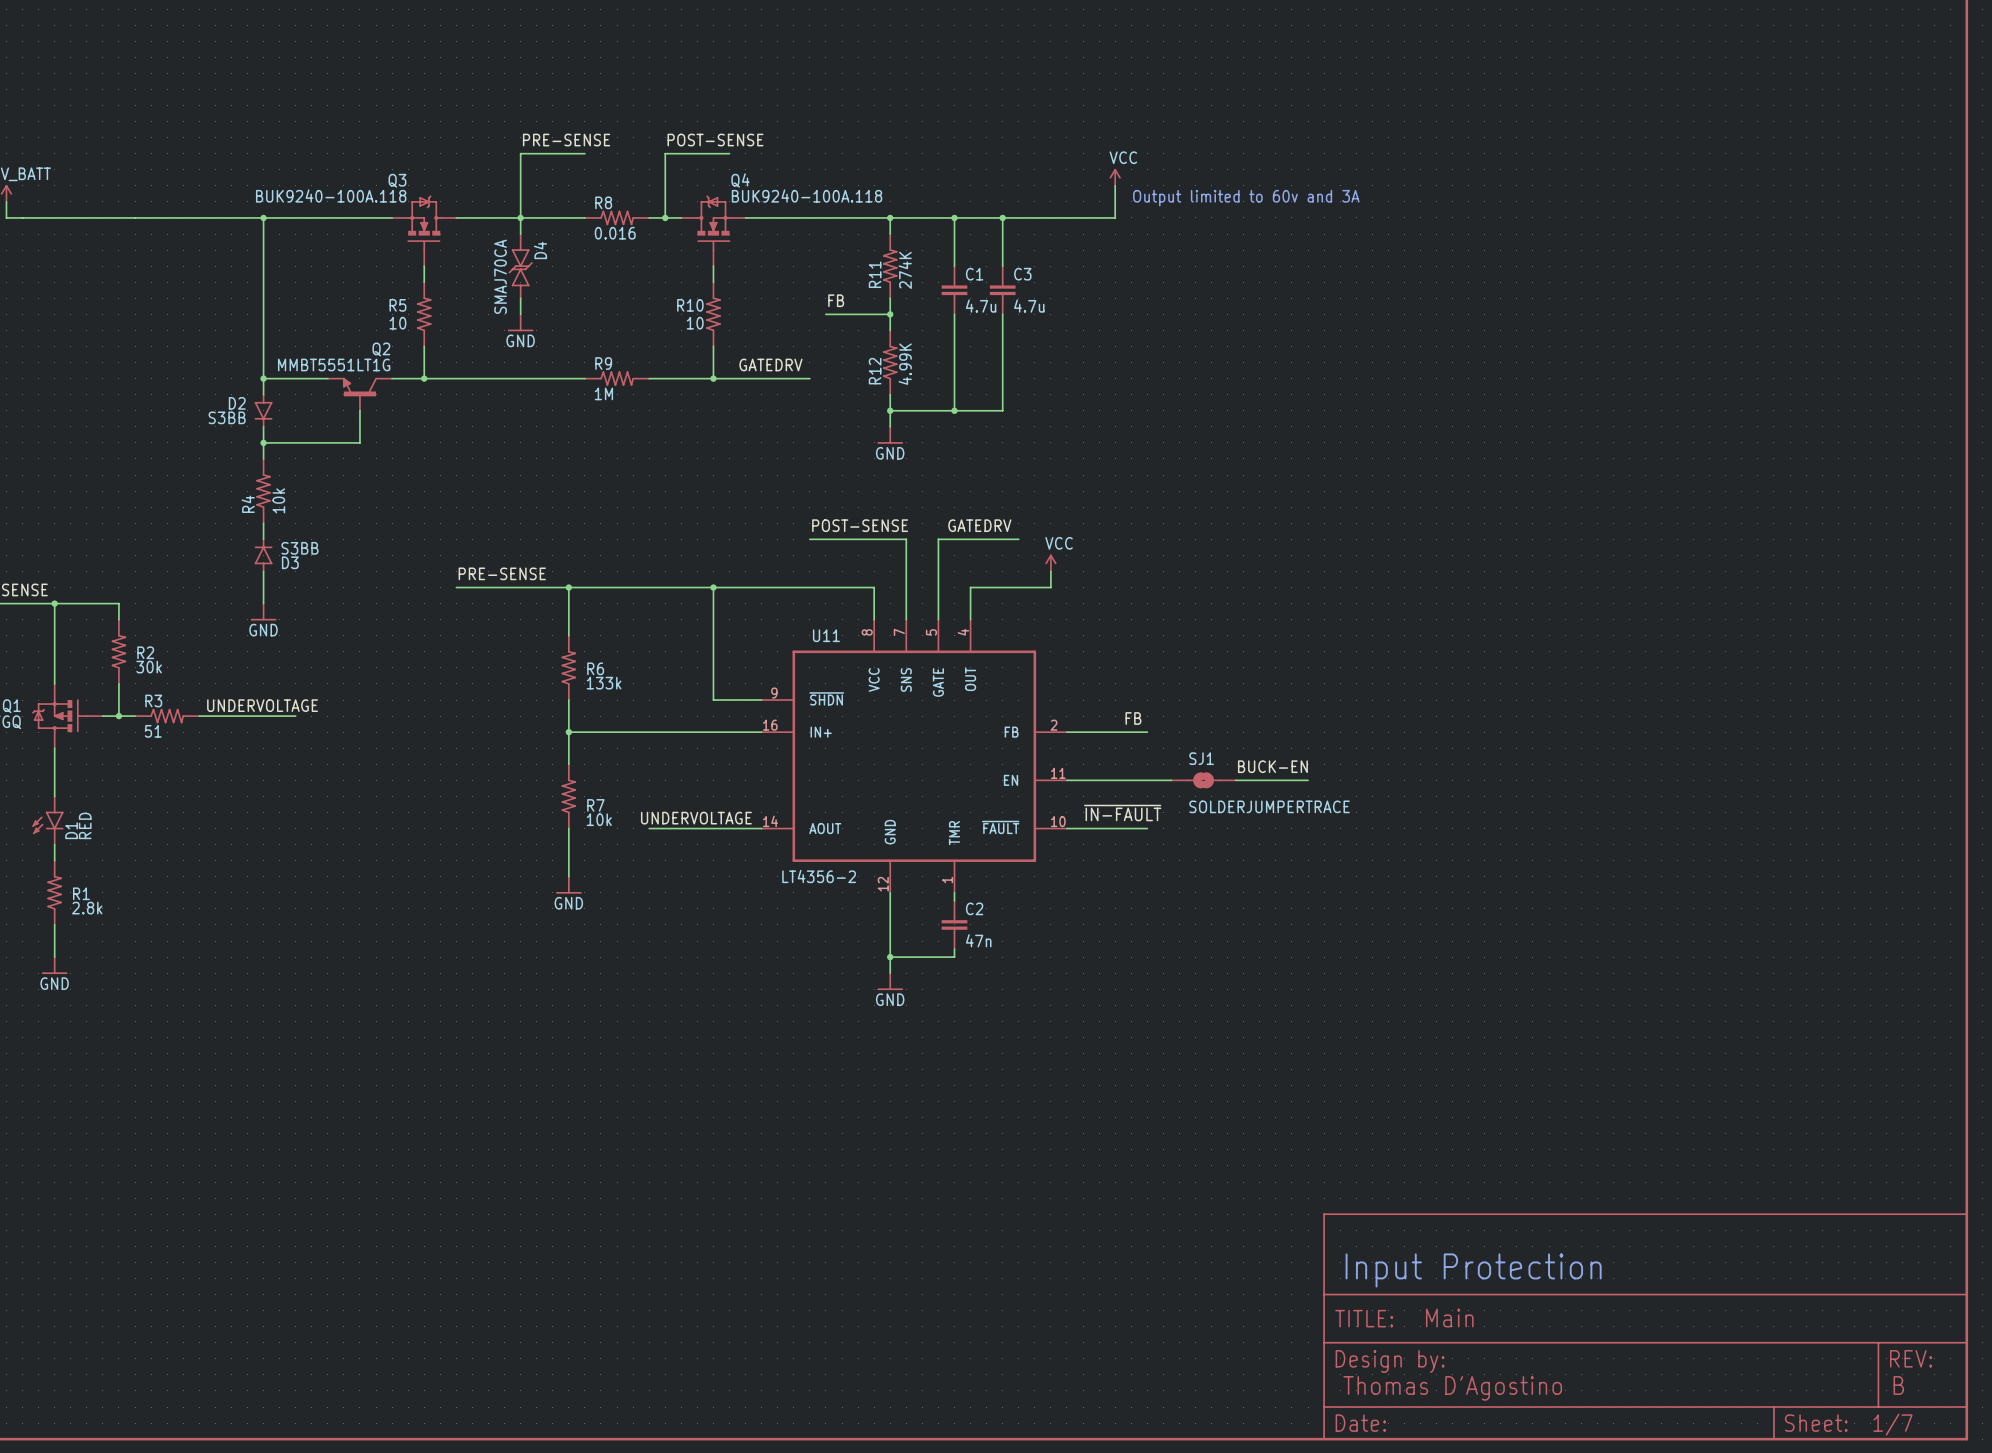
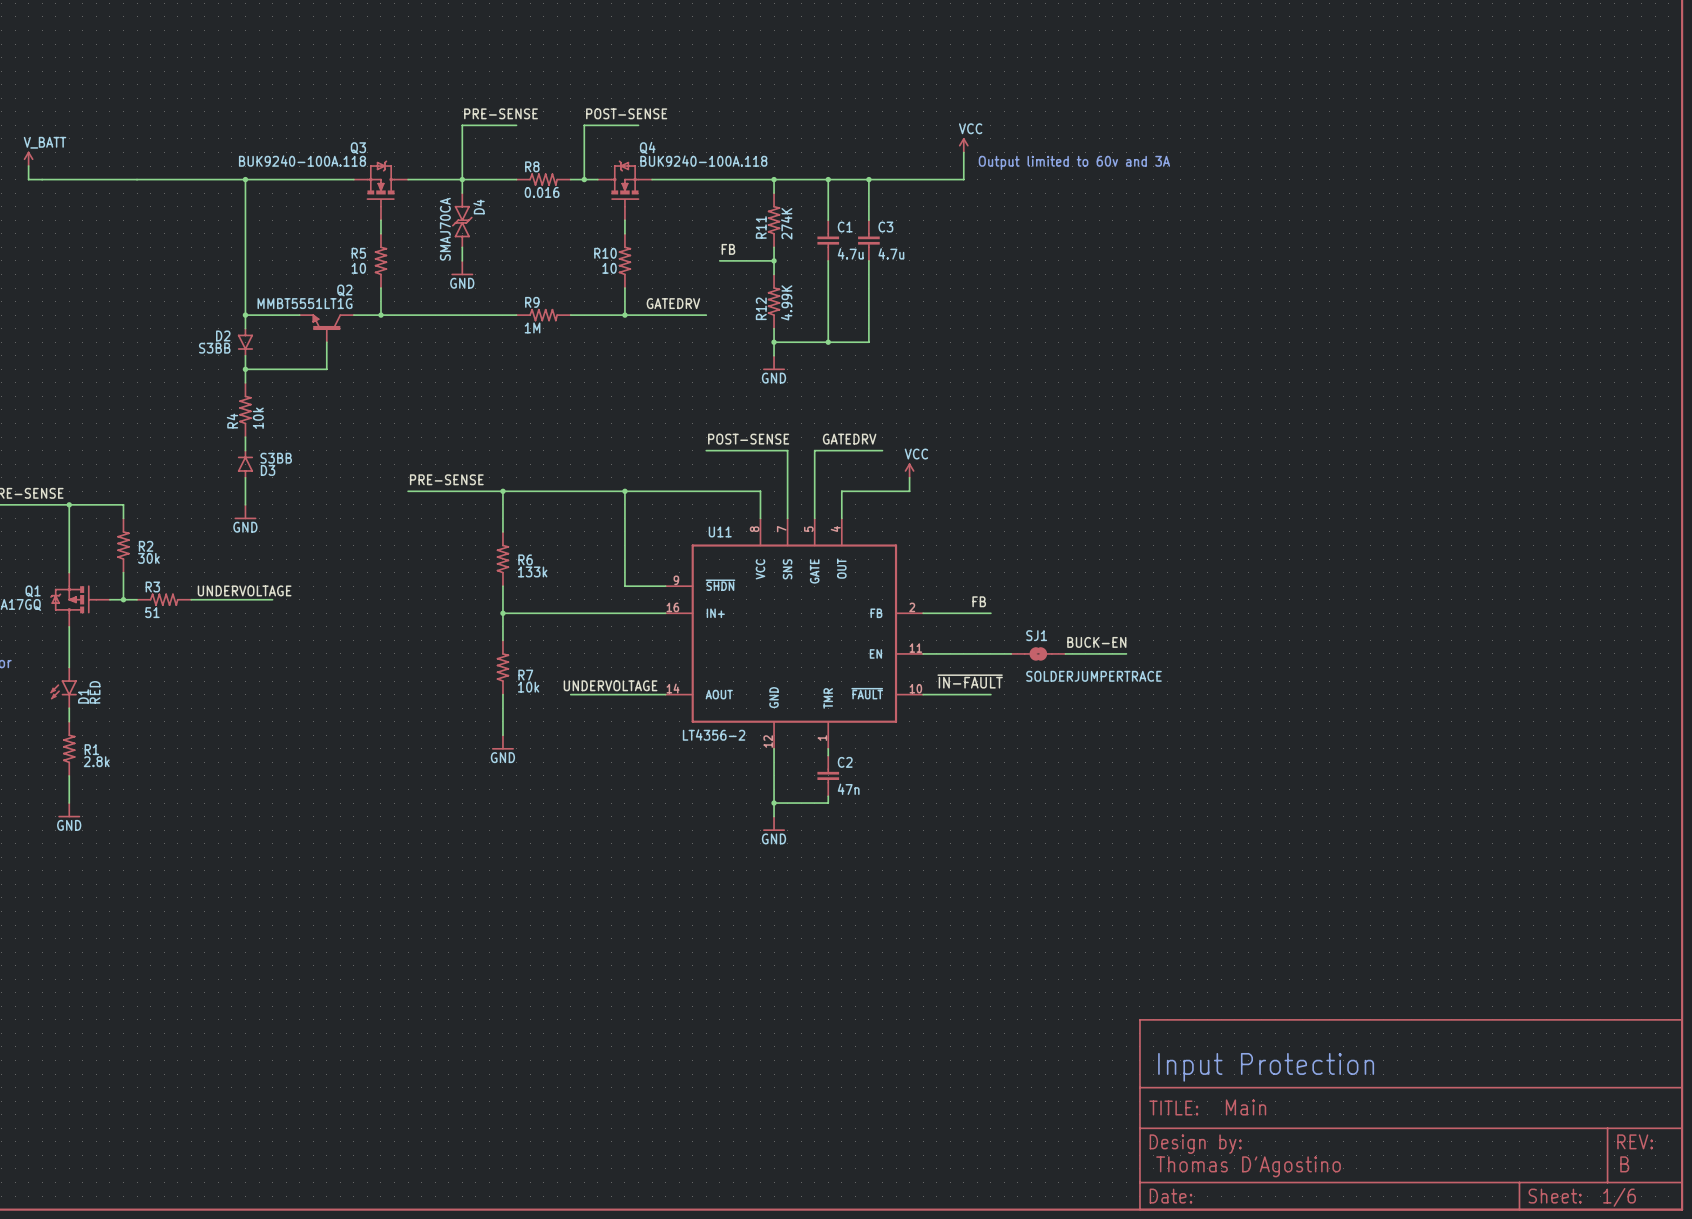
part text: 1/7 (1892, 1424) -> 1/6 (1619, 1197)

